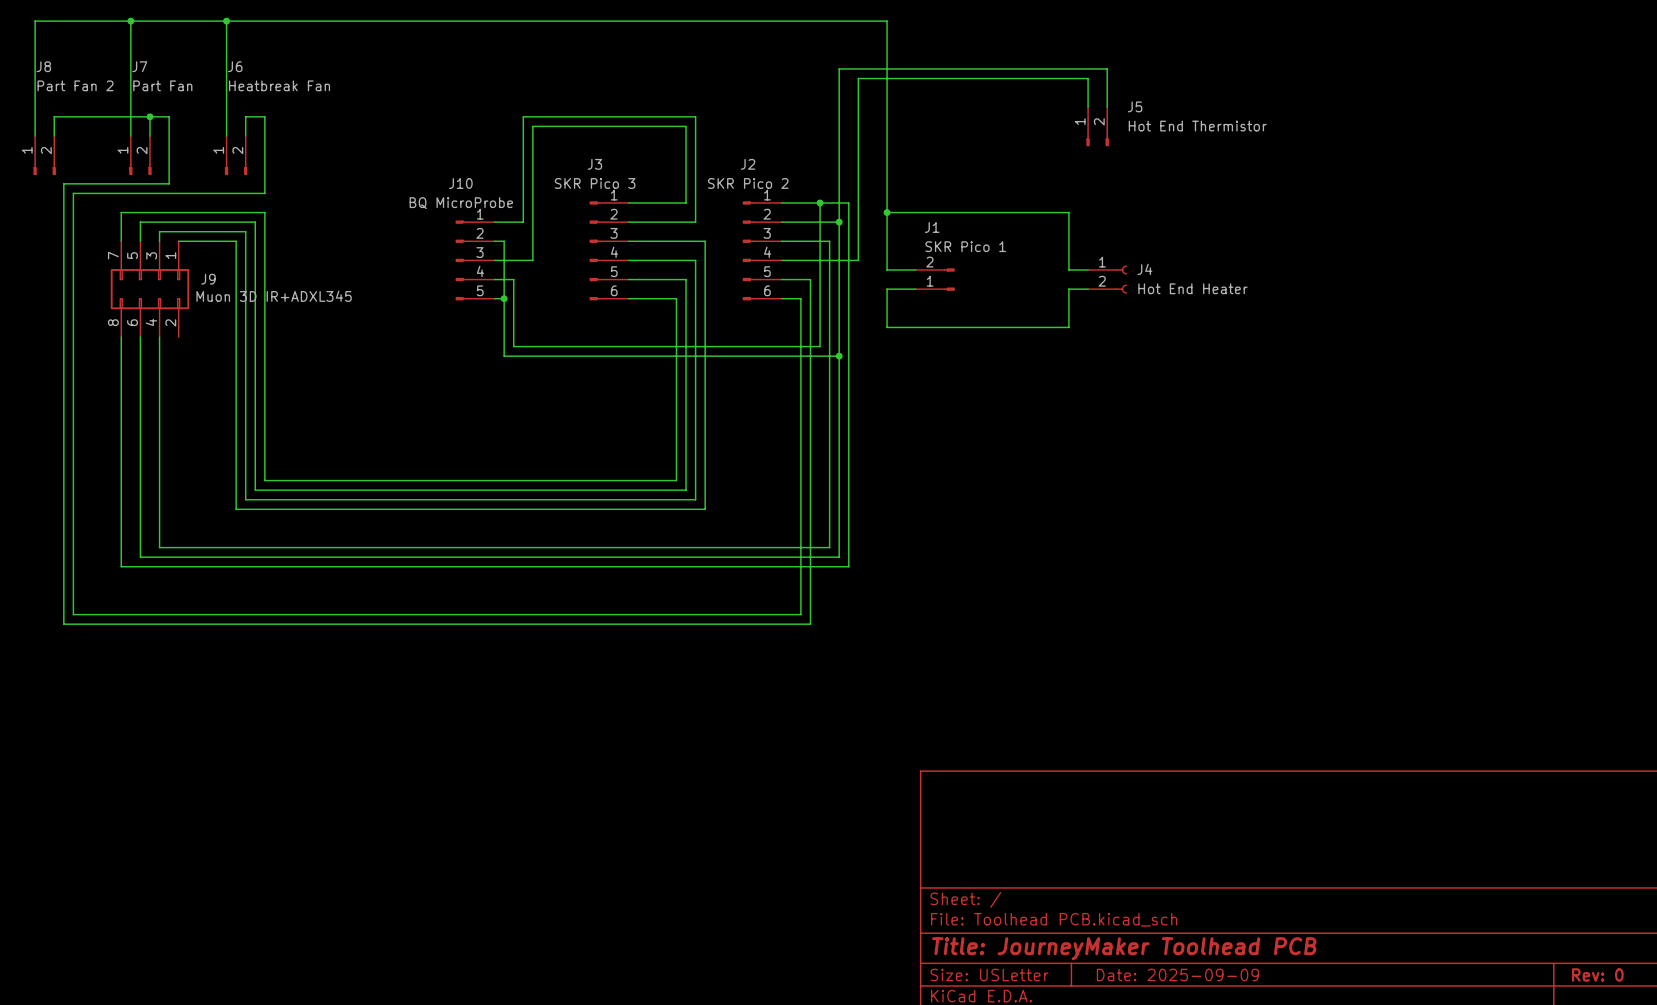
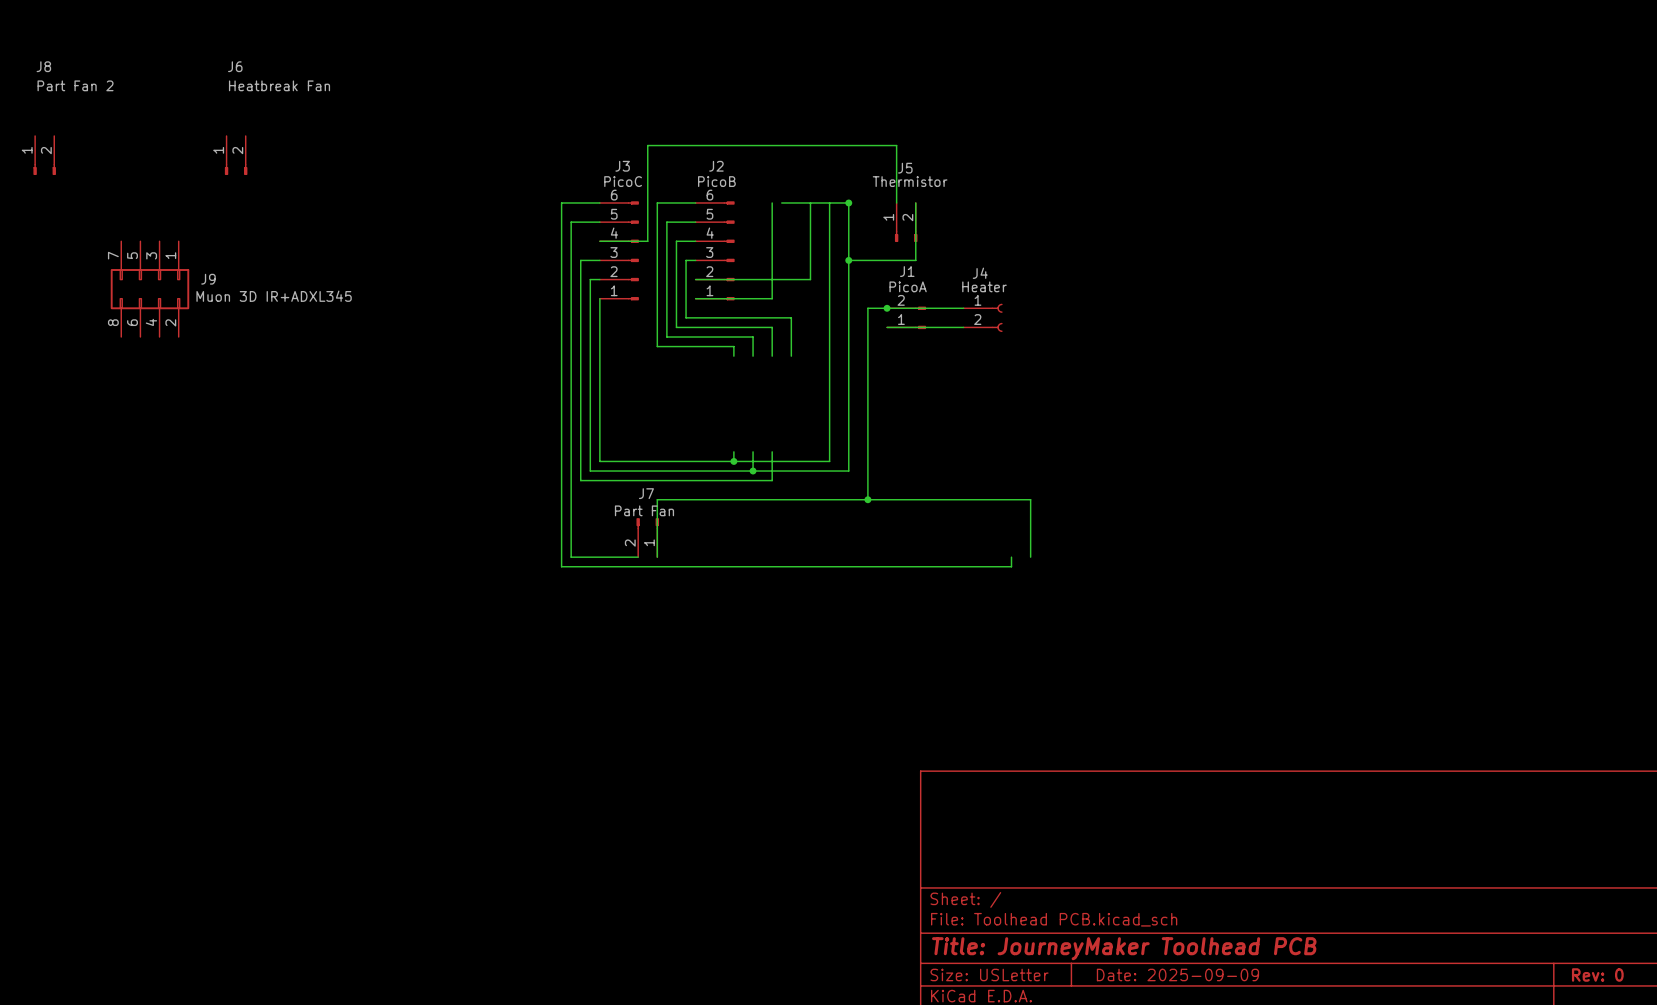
wire: (130, 21) (130, 135) -> none
junction: (130, 21) -> none
wire: (226, 21) (226, 135) -> none
junction: (226, 21) -> none
J7 name position: J7 (139, 66) -> J7 (646, 493)
J7 value position: Part Fan (162, 85) -> Part Fan (644, 510)
J5 name position: J5 (1135, 106) -> J5 (905, 168)
wire: (1088, 107) (1088, 78) (858, 78) (858, 260) -> (915, 202) (915, 260) (858, 260)
wire: (1107, 107) (1107, 68) (839, 68) (839, 557) (638, 557) -> none
wire: (149, 116) (149, 135) -> none
junction: (149, 116) -> none
J5 position: (1097, 126) -> (906, 222)
J5 value: Hot End Thermistor (1197, 126) -> Thermistor (910, 181)
wire: (35, 135) (35, 21) (887, 21) (887, 269) (915, 269) -> none
wire: (54, 135) (54, 116) (169, 116) (169, 183) (63, 183) (63, 624) (810, 624) (810, 279) -> (810, 202) (810, 279)
wire: (245, 135) (245, 116) (264, 116) (264, 193) (73, 193) (73, 614) (800, 614) (800, 298) (781, 298) -> none
J7 position: (140, 155) -> (647, 537)
J3 name position: J3 (594, 164) -> J3 (622, 166)
J2 name position: J2 (748, 164) -> J2 (716, 166)
J7 rotation: 0° (140, 169) -> 180° (647, 523)
J3 value: SKR Pico 3 (595, 183) -> PicoC (623, 181)
J2 value: SKR Pico 2 (748, 183) -> PicoB (716, 181)
wire: (628, 202) (657, 202) -> (657, 346) (657, 202)
wire: (686, 202) (686, 126) (532, 126) (532, 260) (494, 260) -> (686, 202) (695, 202)
wire: none -> (772, 202) (772, 298) (695, 298)
wire: (820, 202) (820, 346) (733, 346) -> (733, 356) (733, 346)
junction: (820, 202) -> none
junction: none -> (848, 202)
wire: none -> (896, 202) (896, 145) (647, 145) (647, 241)
wire: (887, 212) (1068, 212) (1068, 269) (1088, 269) -> none
junction: (887, 212) -> none
wire: (494, 222) (523, 222) (523, 116) (695, 116) (695, 222) -> none
wire: (628, 222) (666, 222) -> (753, 356) (753, 337) (666, 337) (666, 222)
wire: (781, 222) (839, 222) -> none
junction: (839, 222) -> none
J1 name position: J1 (932, 227) -> J1 (907, 271)
wire: (121, 241) (121, 212) (264, 212) (264, 480) (580, 480) -> (599, 260) (580, 260) (580, 480)
wire: (140, 241) (140, 222) (255, 222) (255, 490) (686, 490) (686, 317) -> (791, 356) (791, 317) (686, 317)
wire: (159, 241) (159, 231) (245, 231) (245, 499) (657, 499) -> (657, 557) (657, 499)
wire: (178, 241) (236, 241) (236, 509) (705, 509) (705, 241) (695, 241) -> none
wire: (494, 241) (504, 241) (504, 356) (839, 356) -> none
wire: (647, 241) (676, 241) -> (676, 298) (676, 241)
wire: (781, 241) (829, 241) -> (829, 202) (829, 241)
J1 value: SKR Pico 1 (965, 246) -> PicoA (908, 286)
J3 rotation: 0° (595, 250) -> 180° (633, 250)
J2 rotation: 0° (748, 250) -> 180° (729, 250)
J10: BQ MicroProbe (475, 260) -> none
wire: (628, 260) (686, 260) -> (686, 279) (686, 260)
wire: (695, 260) (695, 499) -> (1030, 557) (1030, 499) (695, 499)
wire: (781, 260) (848, 260) -> none
junction: none -> (848, 260)
J4 name position: J4 (1144, 269) -> J4 (980, 273)
wire: (494, 279) (513, 279) (513, 346) (657, 346) -> none
wire: none -> (599, 279) (590, 279) (590, 471) (848, 471)
wire: (628, 279) (686, 279) -> none
wire: none -> (695, 279) (781, 279)
J1 position: (935, 279) -> (906, 317)
J4 position: (1107, 279) -> (983, 317)
J4 value: Hot End Heater (1192, 288) -> Heater (984, 286)
wire: (915, 289) (887, 289) (887, 327) -> none
wire: (1088, 289) (1068, 289) (1068, 327) (963, 327) -> none
wire: (494, 298) (504, 298) -> none
junction: (504, 298) -> none
wire: (628, 298) (676, 298) -> none
junction: none -> (887, 308)
wire: none -> (963, 308) (867, 308) (867, 499)
wire: (676, 327) (676, 480) -> (676, 327) (772, 327) (772, 356)
wire: (121, 337) (121, 566) (561, 566) -> (599, 202) (561, 202) (561, 566)
wire: (140, 337) (140, 557) (571, 557) -> (599, 222) (571, 222) (571, 557)
wire: (159, 337) (159, 547) (829, 547) (829, 461) -> (599, 298) (599, 461) (829, 461)
junction: (839, 356) -> none
wire: none -> (733, 451) (733, 461)
wire: none -> (753, 451) (753, 471)
wire: none -> (772, 451) (772, 480) (676, 480)
junction: none -> (733, 461)
junction: none -> (753, 471)
wire: (848, 471) (848, 566) -> (1011, 557) (1011, 566) (848, 566)
junction: none -> (867, 499)

